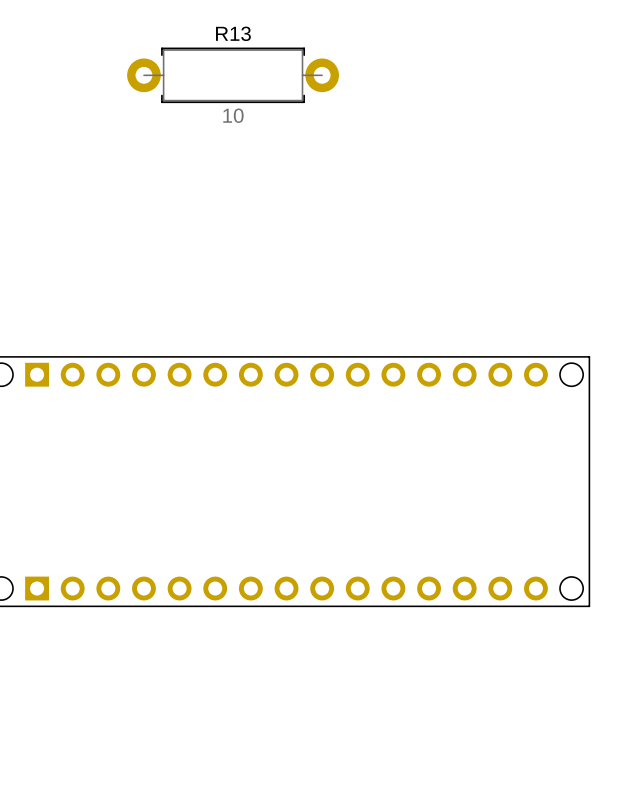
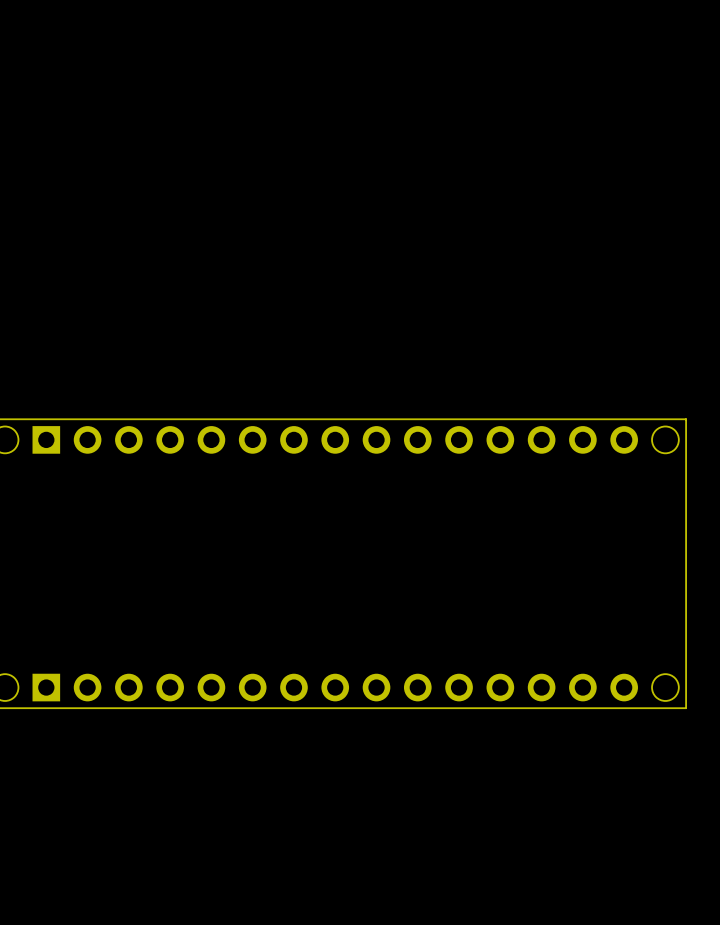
R13: 10 (233, 75) -> none

